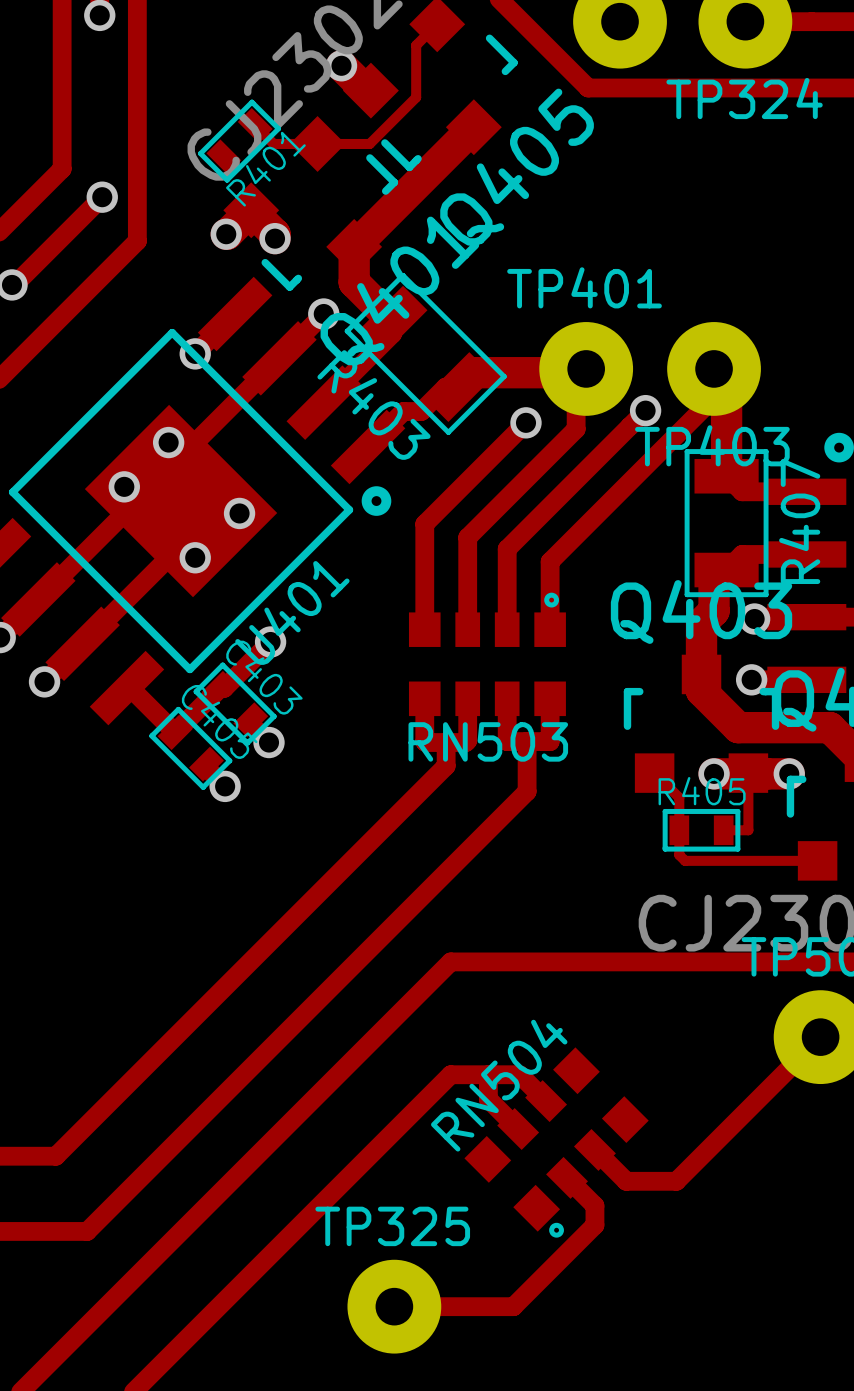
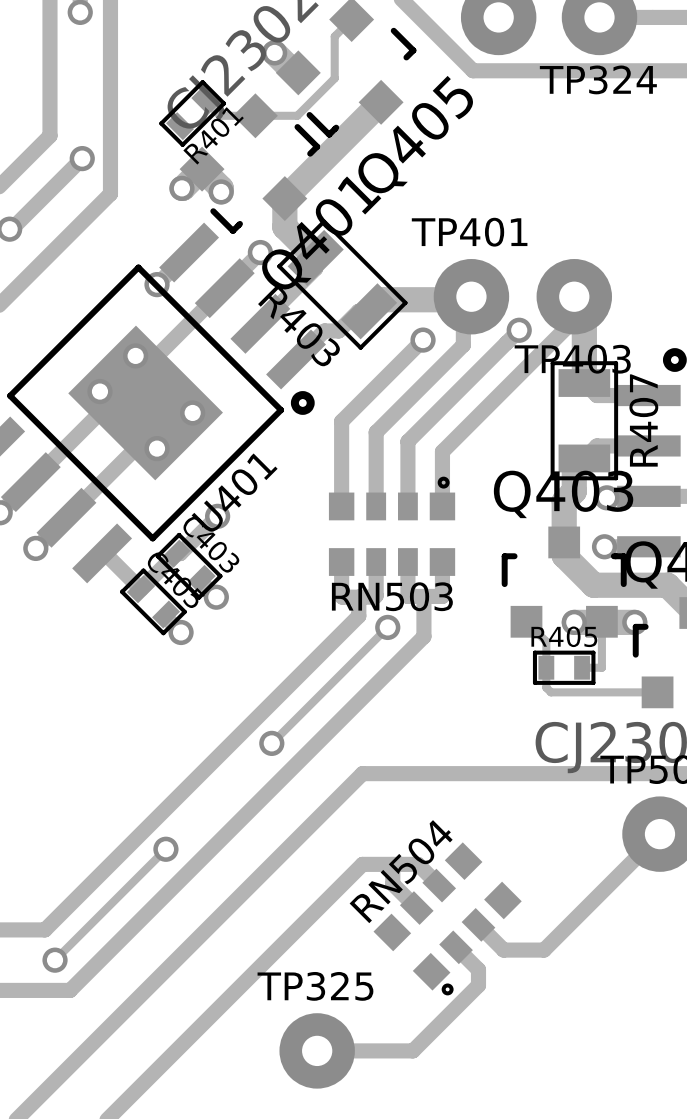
track: none -> (387, 627) (271, 743)
via: none -> (387, 627)
via: none -> (271, 743)
track: none -> (165, 849) (55, 960)
via: none -> (165, 849)
via: none -> (55, 960)

